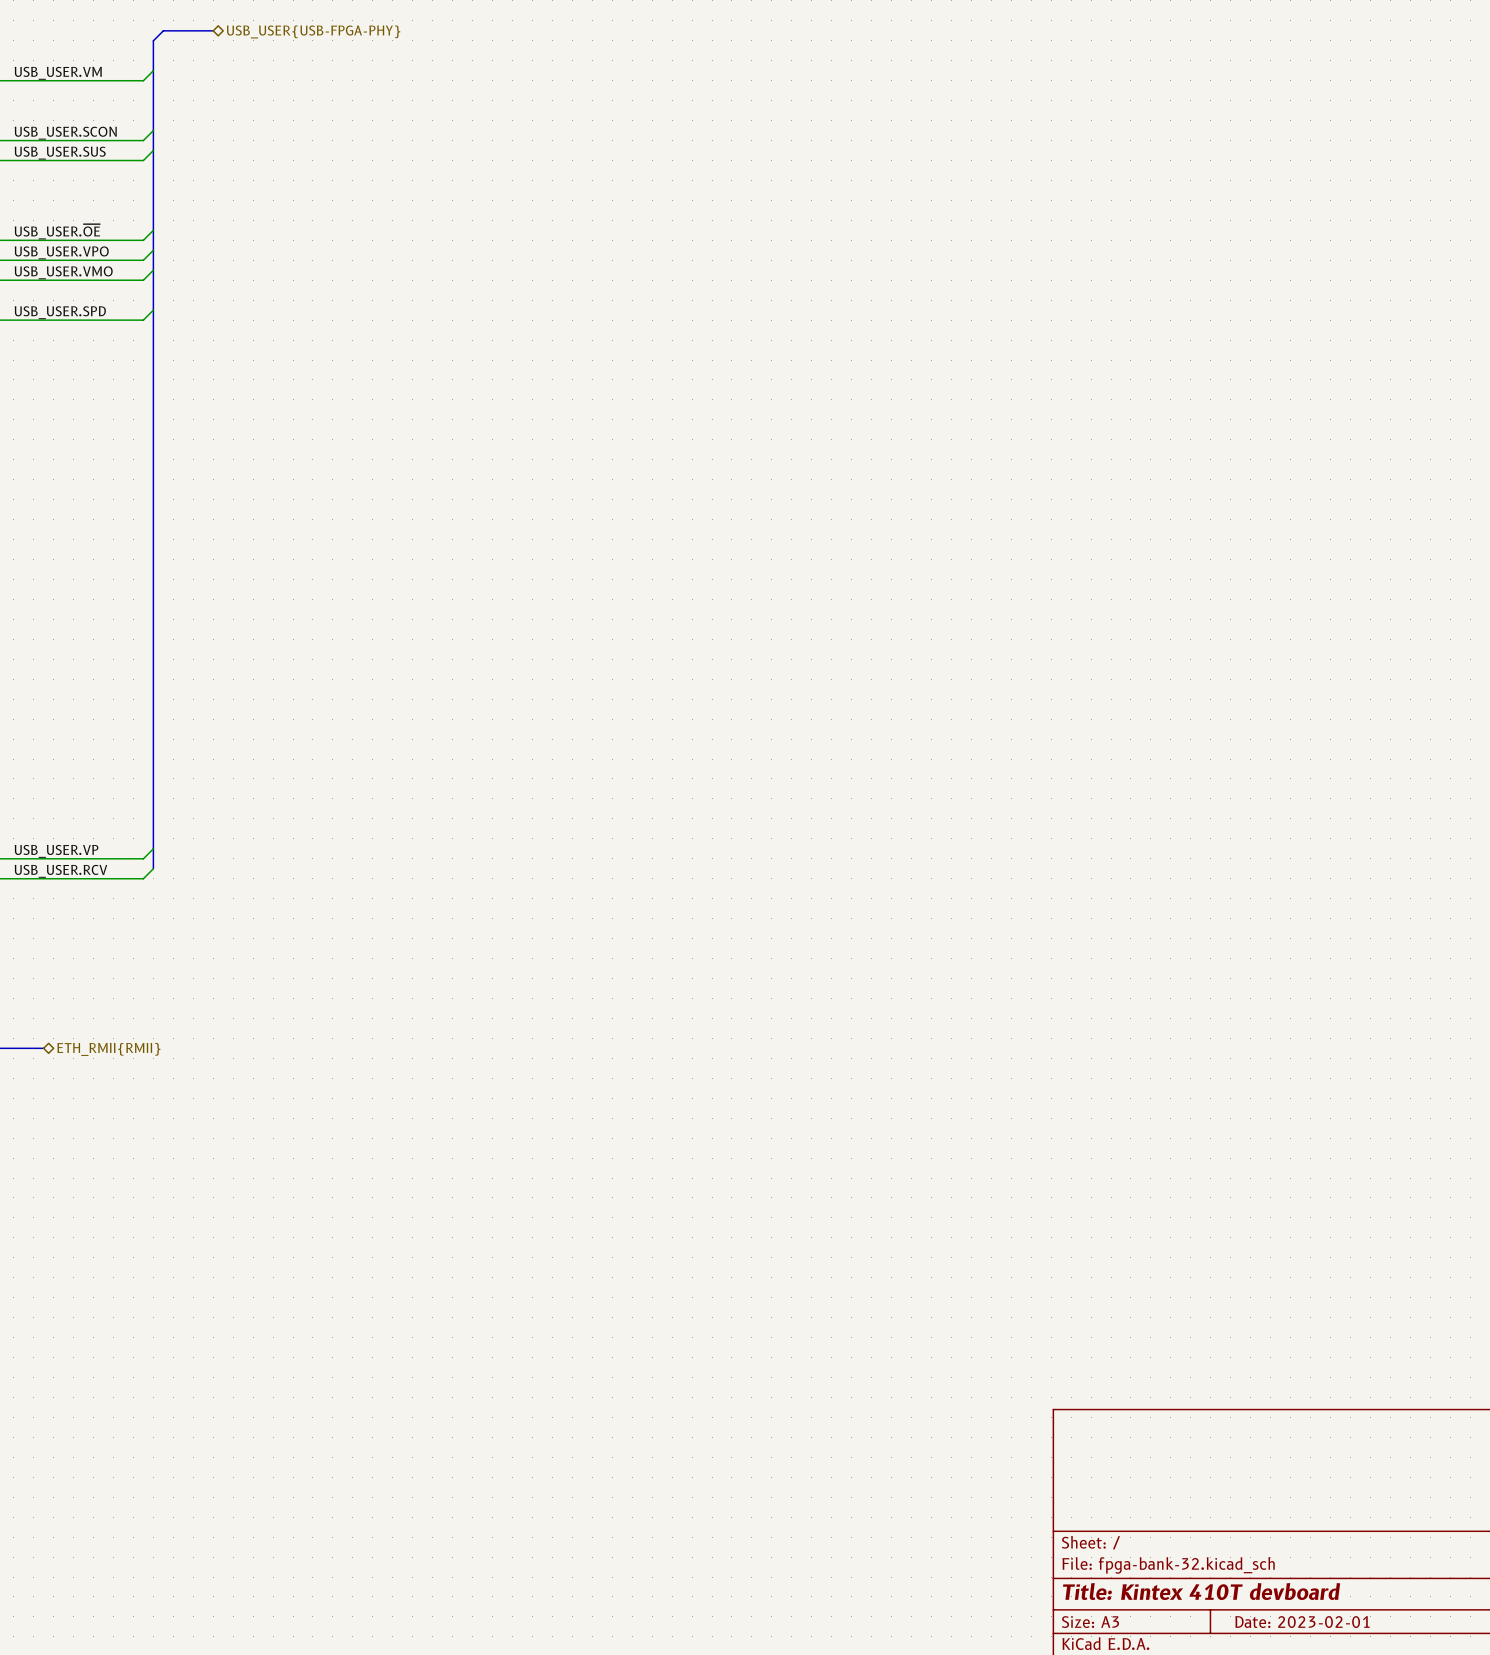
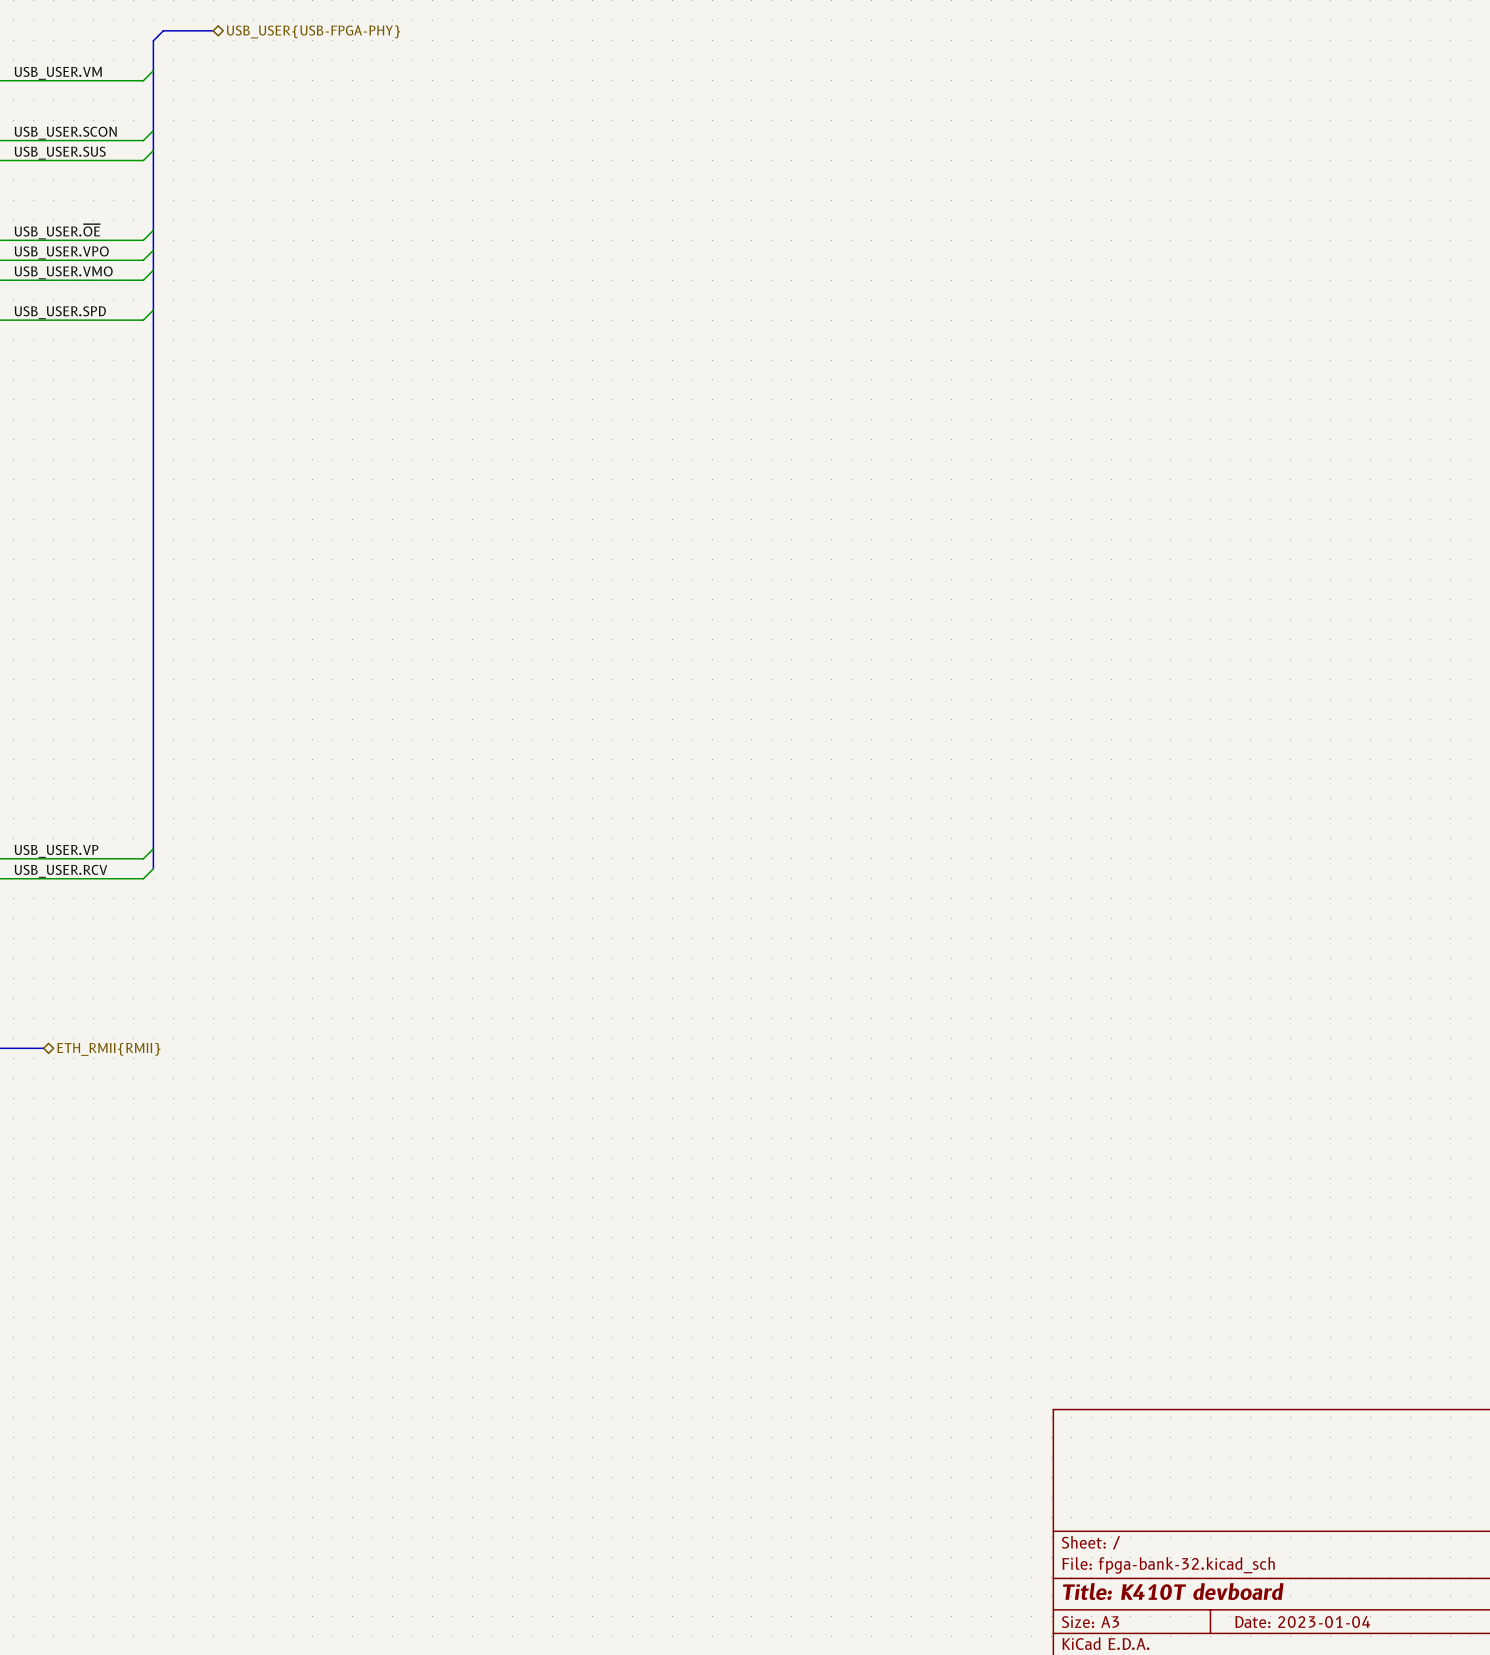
title block: Title: Kintex 410T devboard (1201, 1591) -> Title: K410T devboard (1173, 1591)
title block: Date: 2023-02-01 (1302, 1622) -> Date: 2023-01-04 (1302, 1622)

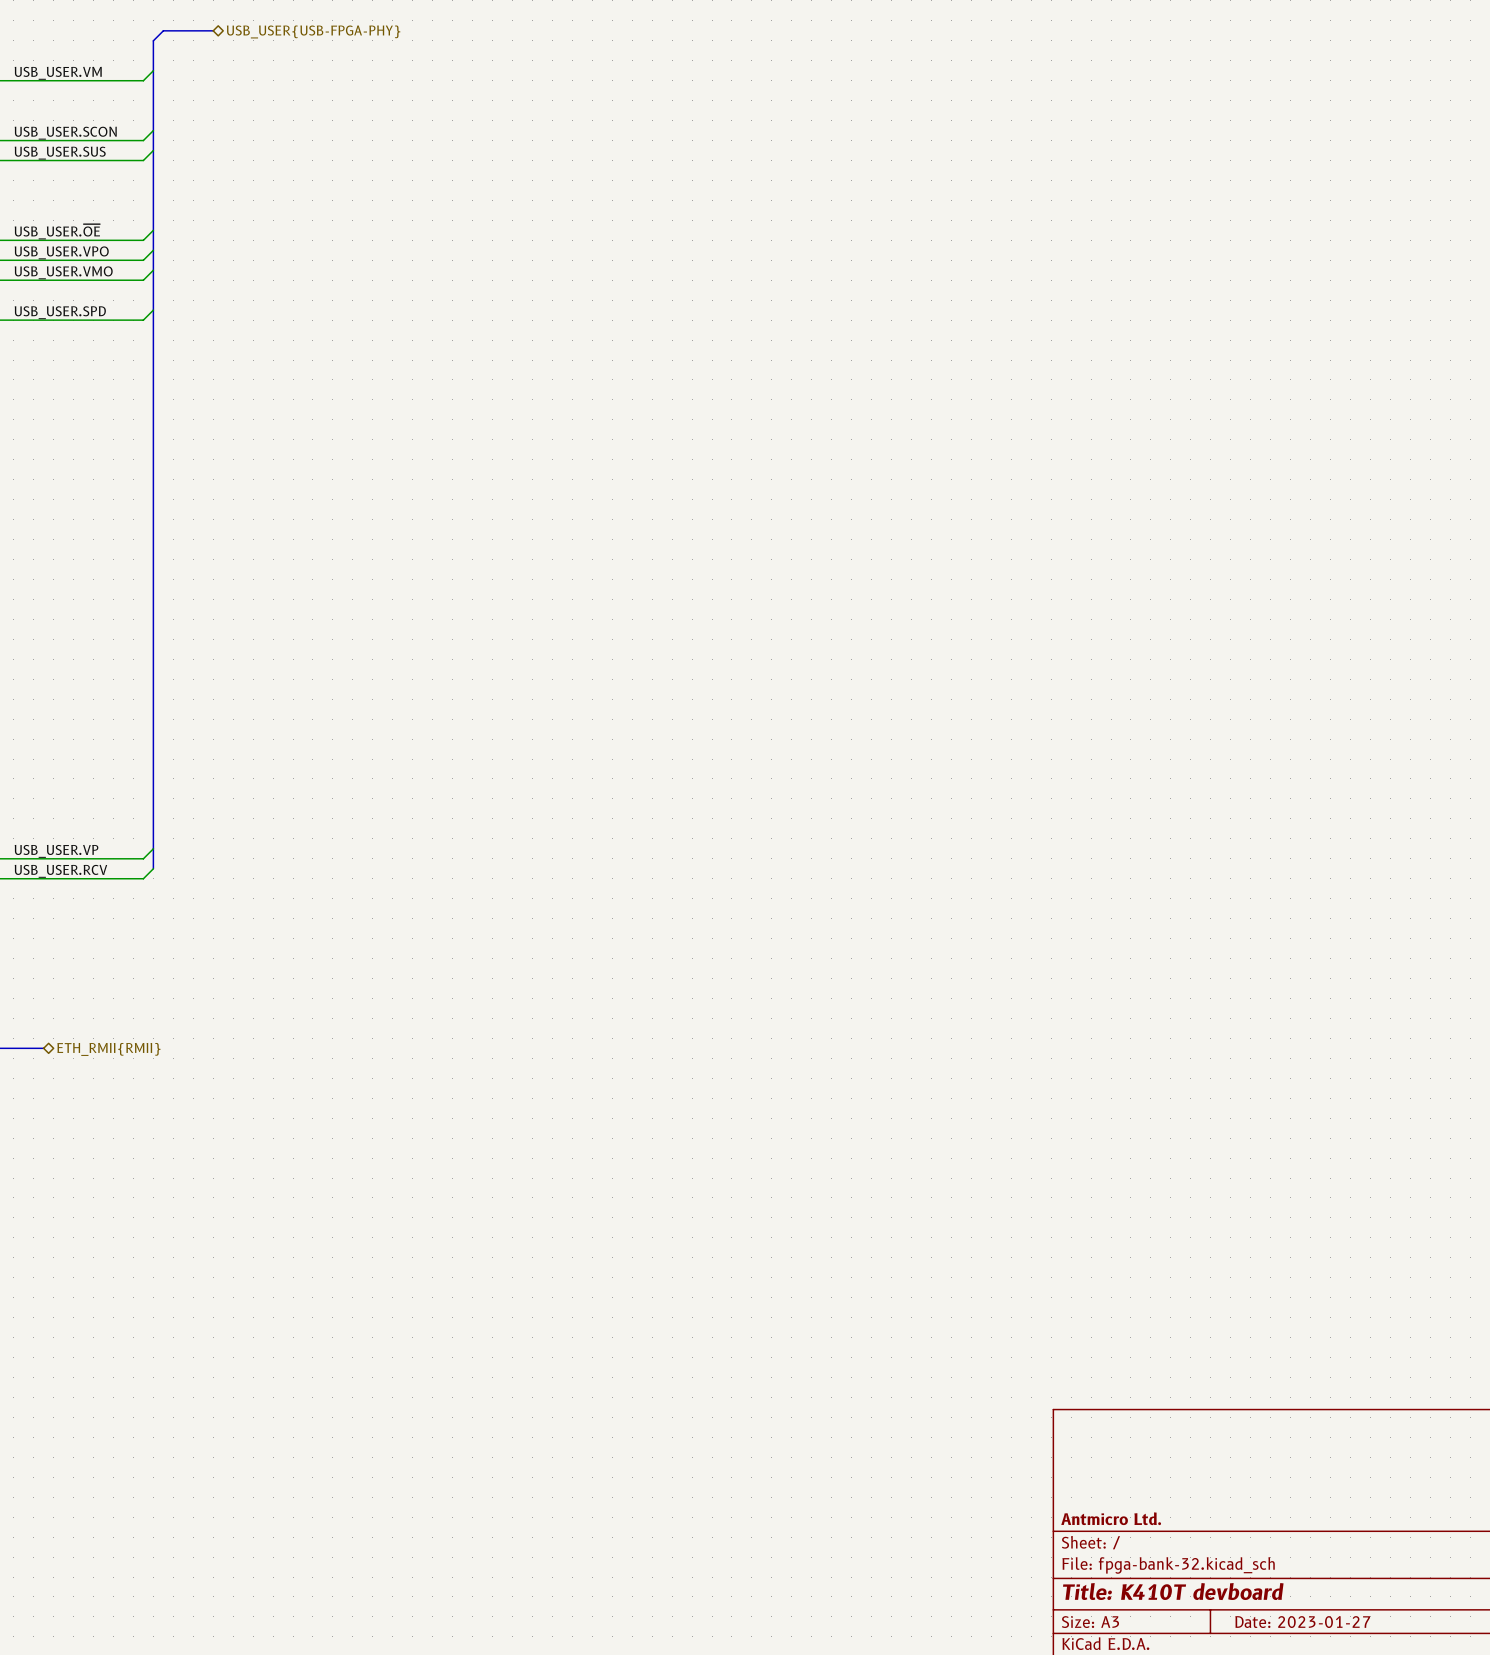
title block: none -> Antmicro Ltd. (1111, 1518)
title block: Date: 2023-01-04 (1302, 1622) -> Date: 2023-01-27 (1302, 1622)

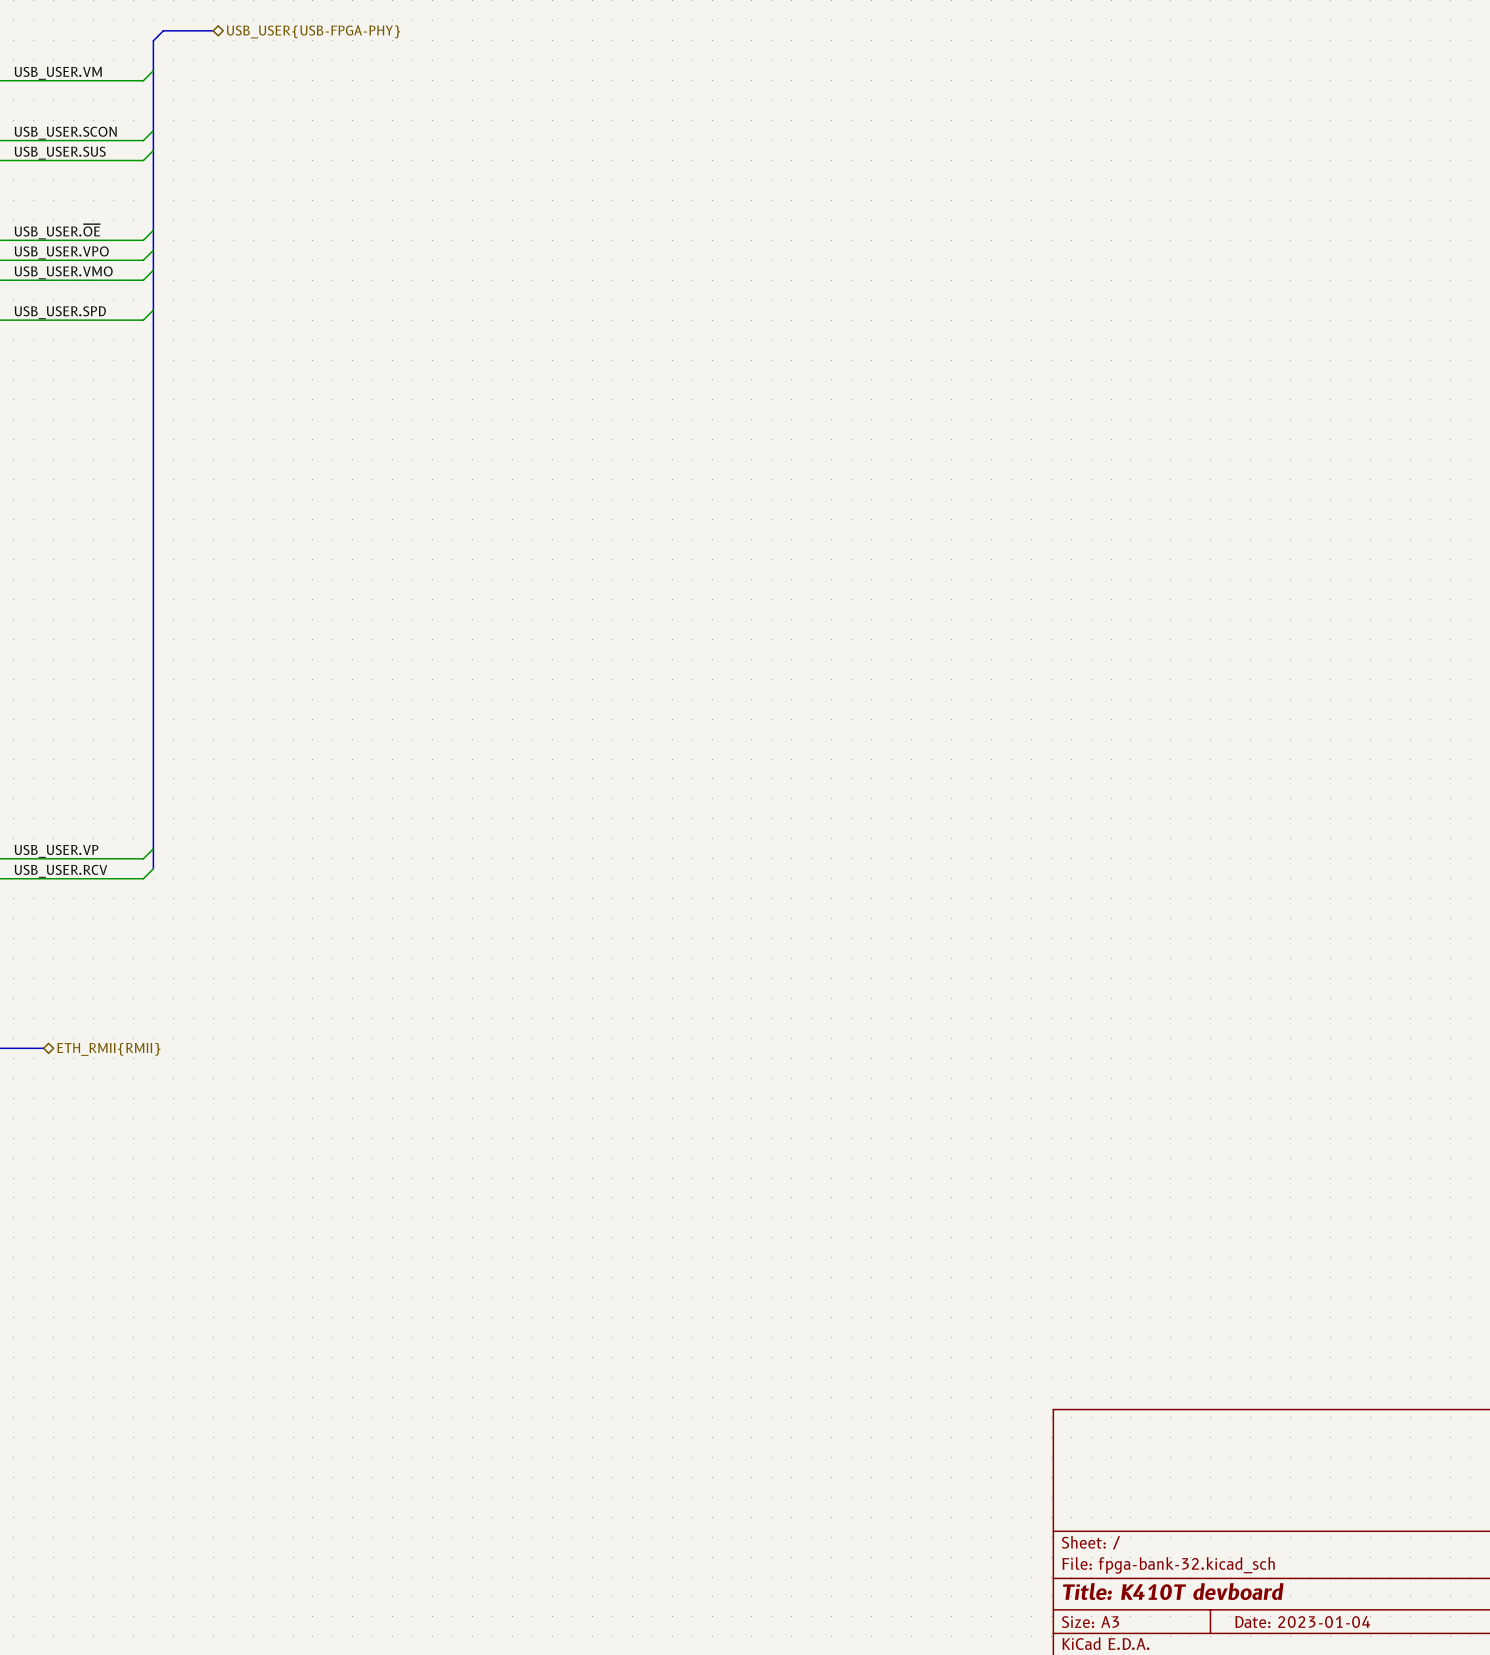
title block: Antmicro Ltd. (1111, 1518) -> none
title block: Date: 2023-01-27 (1302, 1622) -> Date: 2023-01-04 (1302, 1622)

